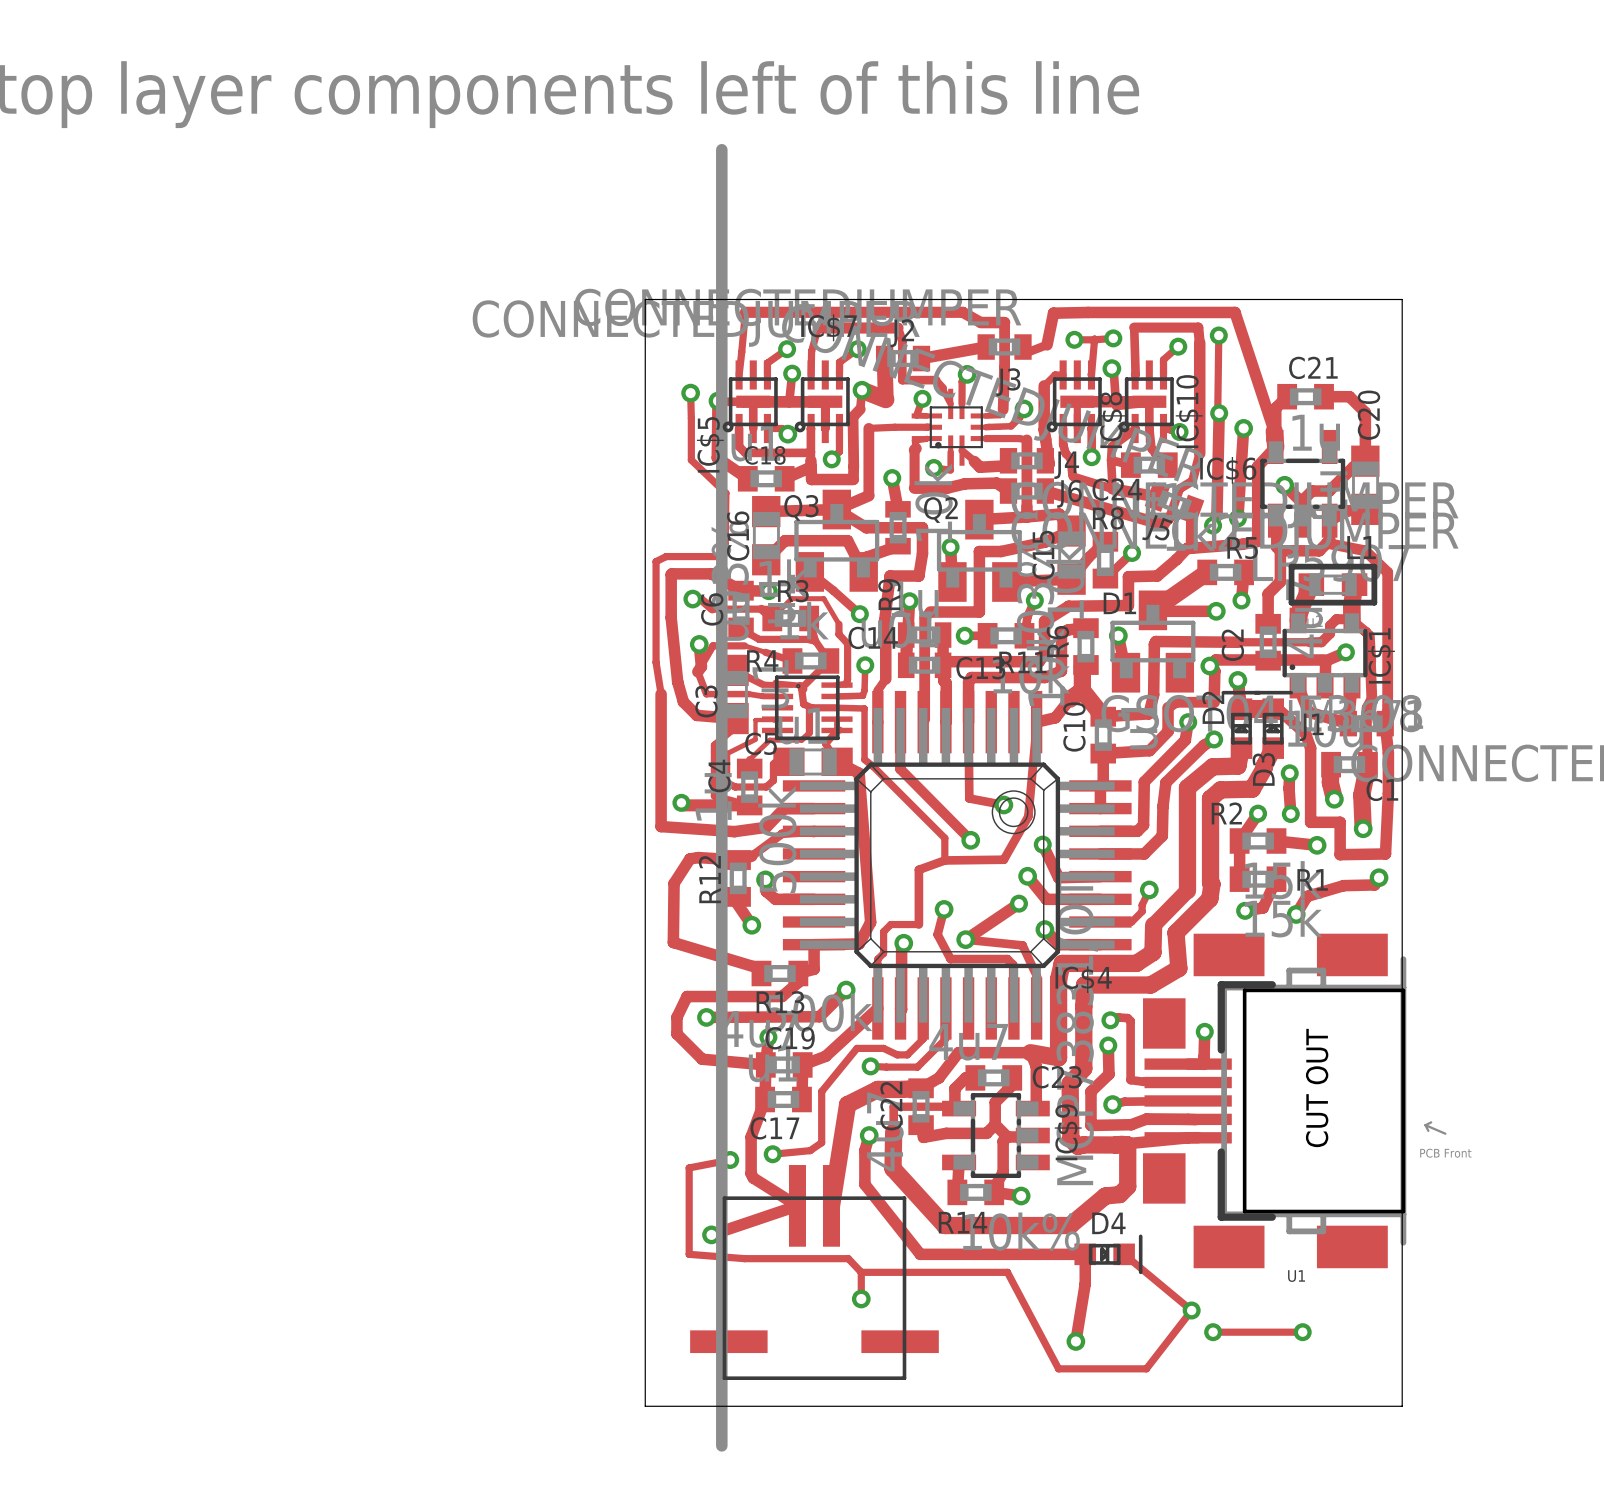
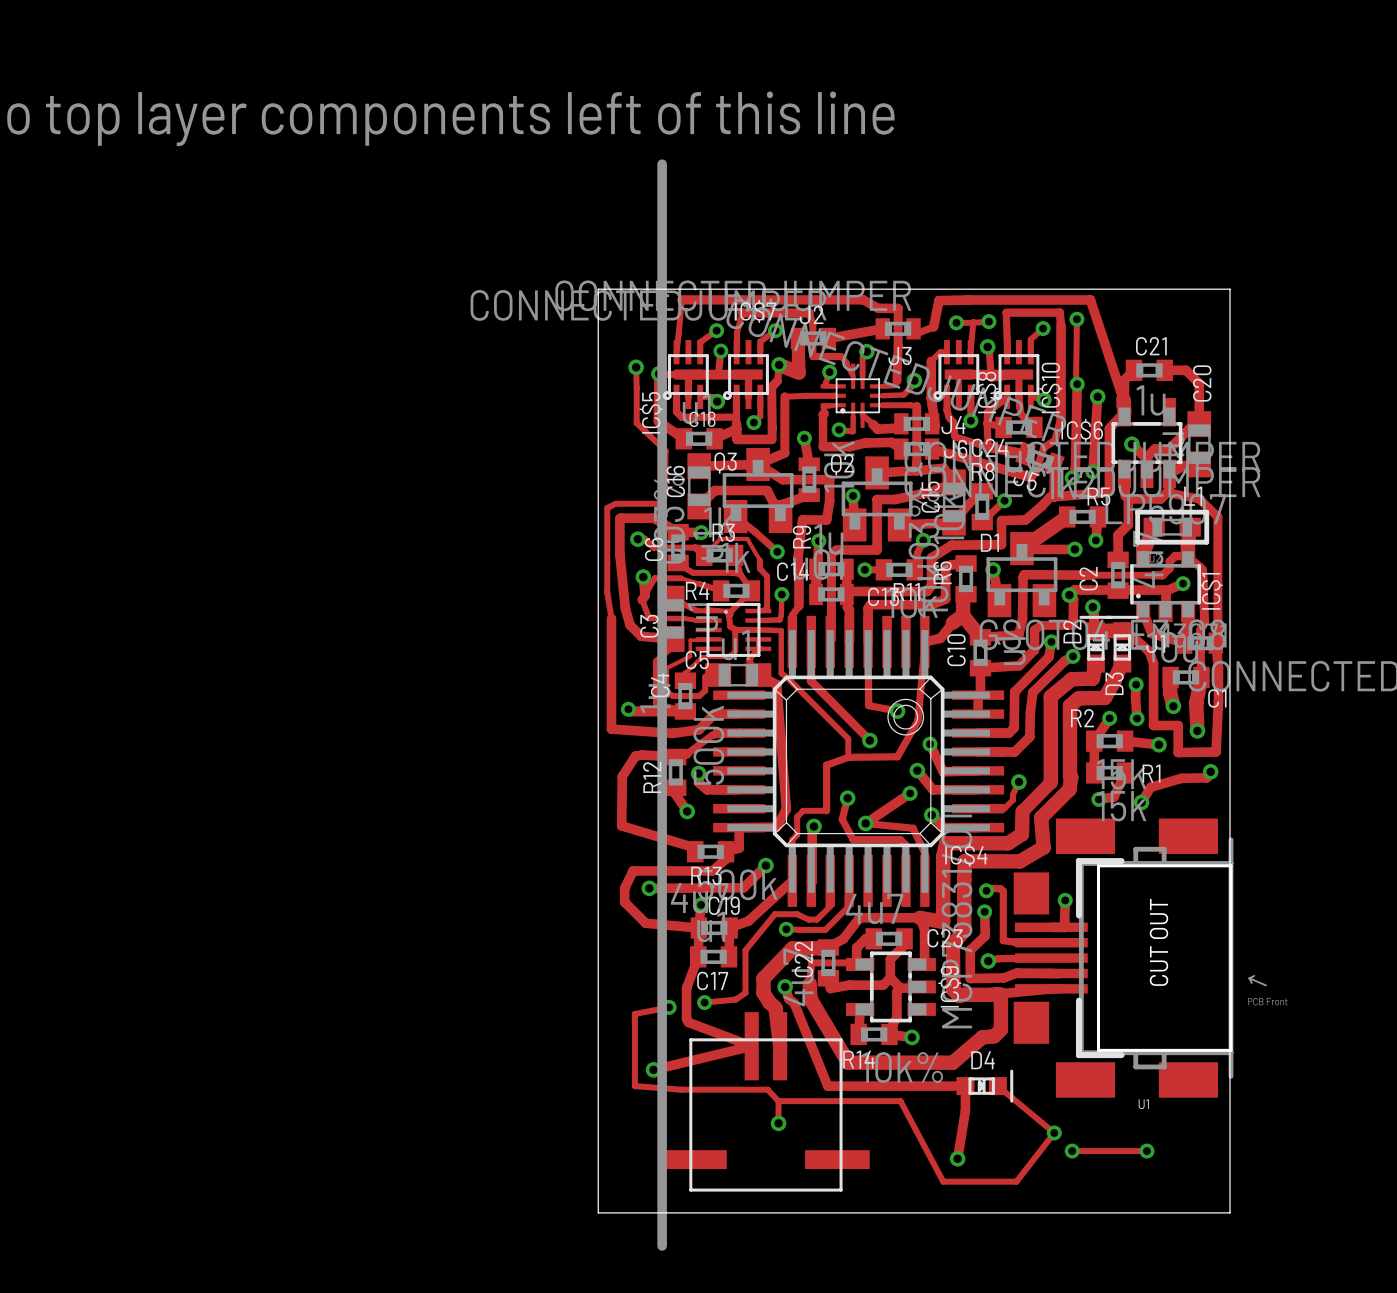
track: (877, 1089) (847, 1104) (831, 1205) -> (792, 948) (763, 978) (763, 992) (775, 1007) (780, 1046)
track: (900, 1106) (893, 1106) (892, 1168) (944, 1225) (1070, 1225) (1105, 1196) -> (811, 962) (810, 998) (848, 1062) (952, 1062) (982, 1037)
track: (869, 1135) (864, 1150) (864, 1184) (920, 1254) -> (785, 986) (788, 998) (794, 1003) (827, 1086)
track: (753, 1178) (797, 1205) (711, 1234) -> (688, 1022) (751, 1046) (653, 1069)
part position: (814, 1272) -> (765, 1101)

